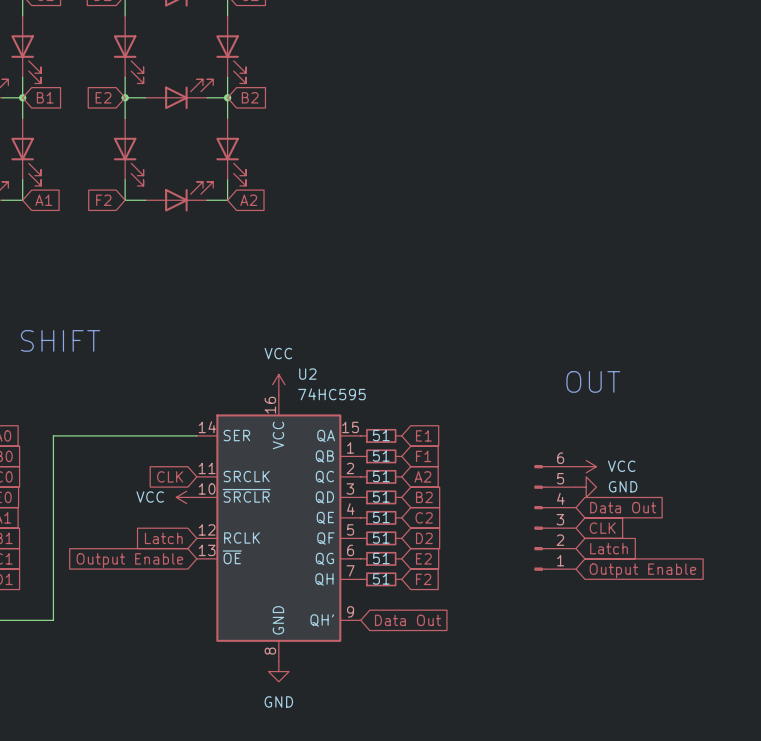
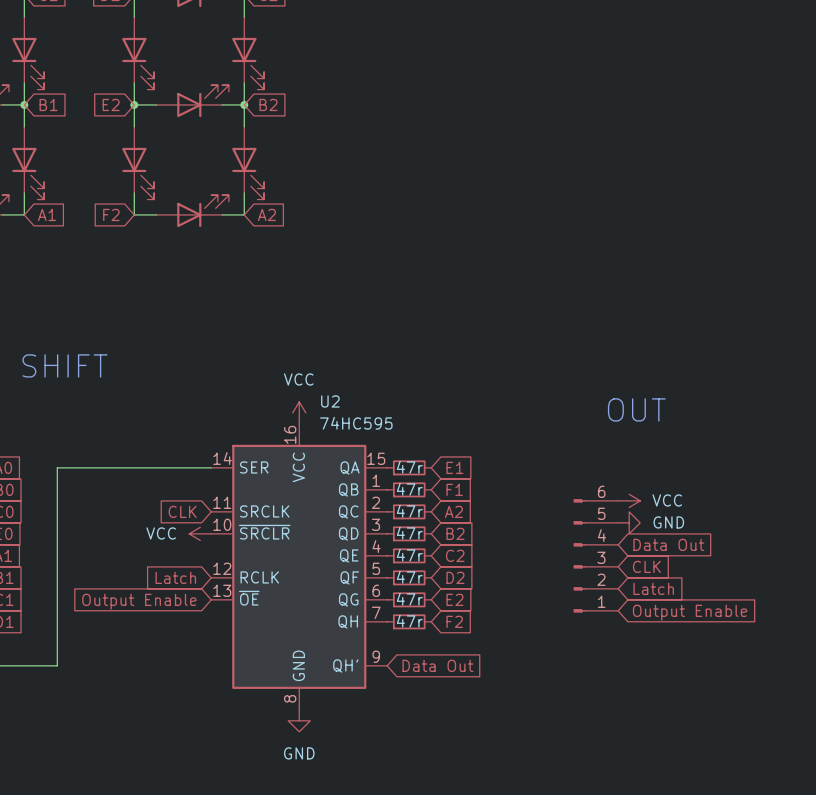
part value: 51 (381, 435) -> 47r (409, 467)
part value: 51 (381, 456) -> 47r (409, 489)
part value: 51 (381, 476) -> 47r (409, 511)
part value: 51 (381, 497) -> 47r (409, 533)
part value: 51 (381, 517) -> 47r (409, 555)
part value: 51 (381, 538) -> 47r (409, 577)
part value: 51 (381, 558) -> 47r (409, 599)
part value: 51 (381, 578) -> 47r (409, 621)

